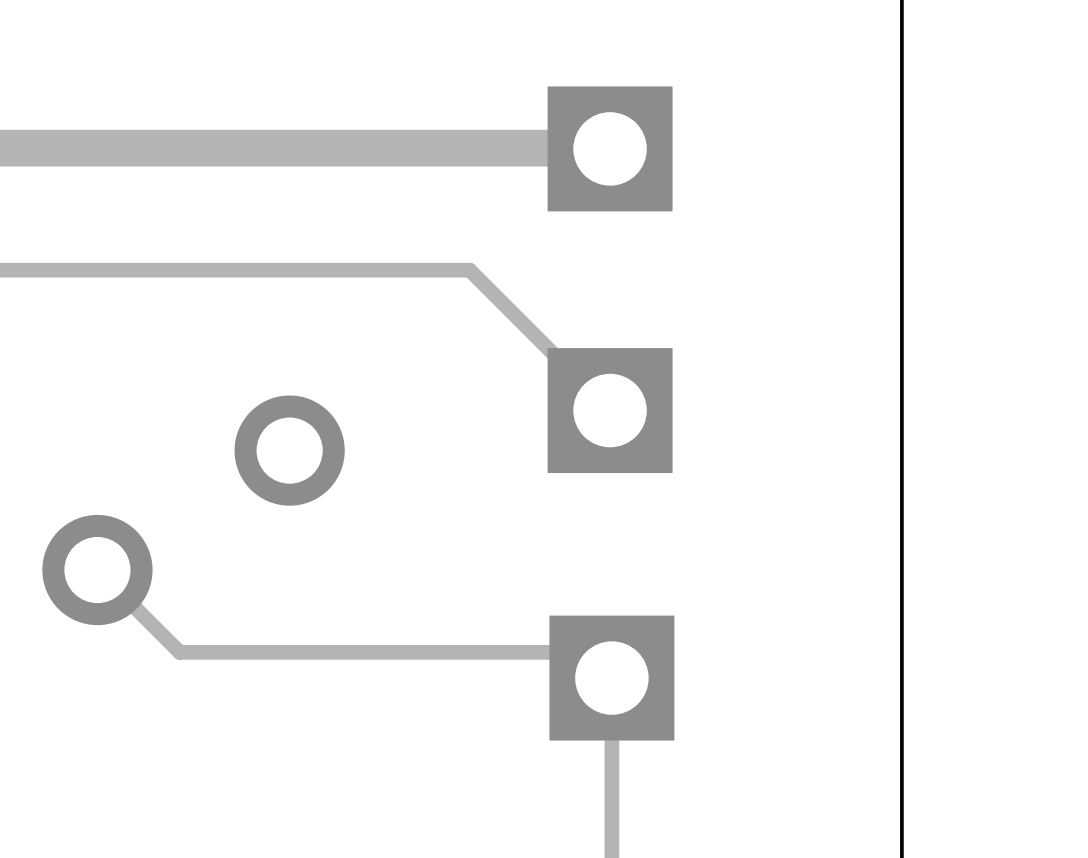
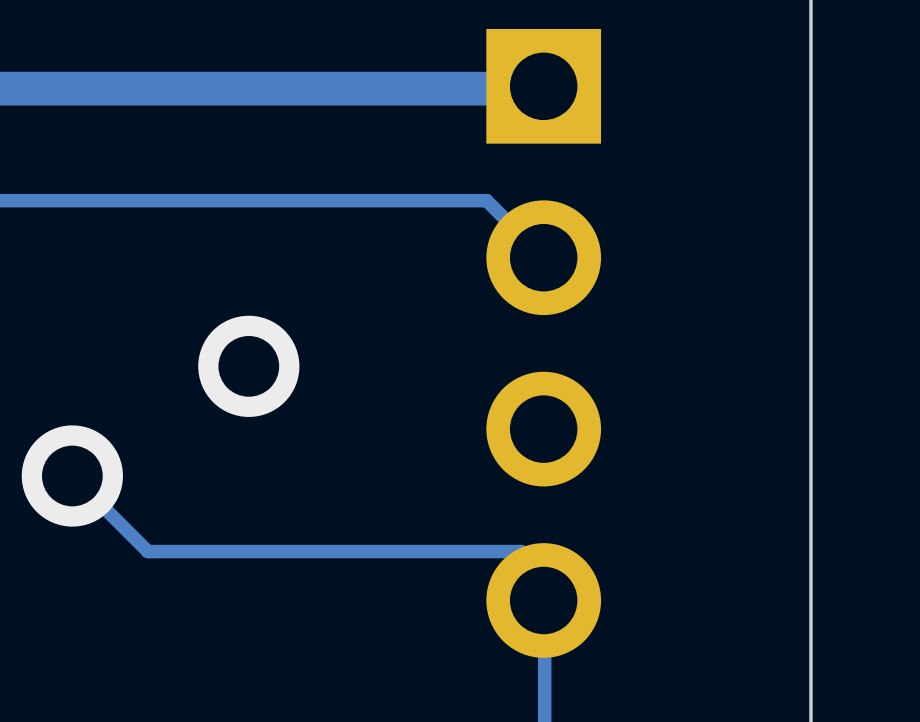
part: (610, 148) -> none
track: (469, 270) (610, 410) -> (414, 200) (486, 200) (543, 257)
part footprint: [547, 348, 673, 474] -> [486, 28, 602, 658]
part: (611, 678) -> none

